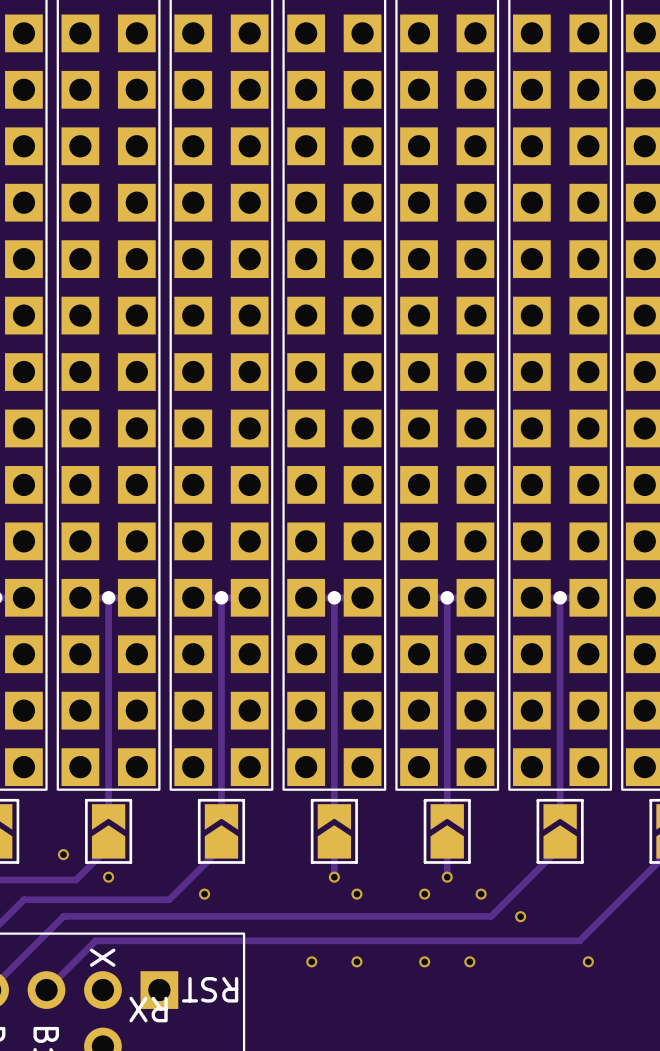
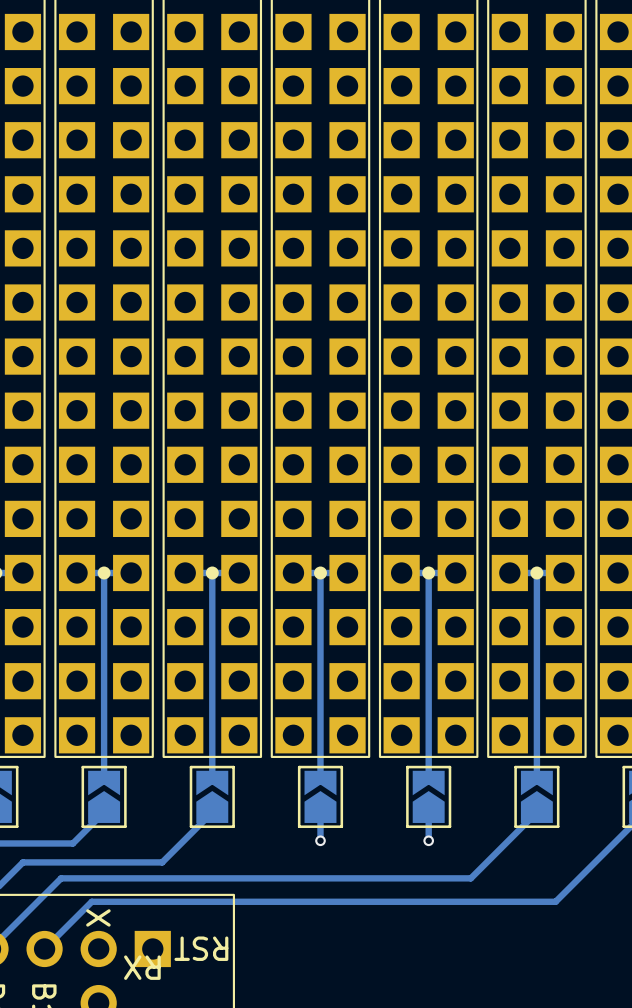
via: (63, 854) -> none
via: (108, 877) -> none
via: (204, 894) -> none
via: (356, 894) -> none
via: (424, 894) -> none
via: (481, 894) -> none
via: (520, 916) -> none
via: (311, 961) -> none
via: (356, 961) -> none
via: (424, 961) -> none
via: (469, 961) -> none
via: (588, 961) -> none

